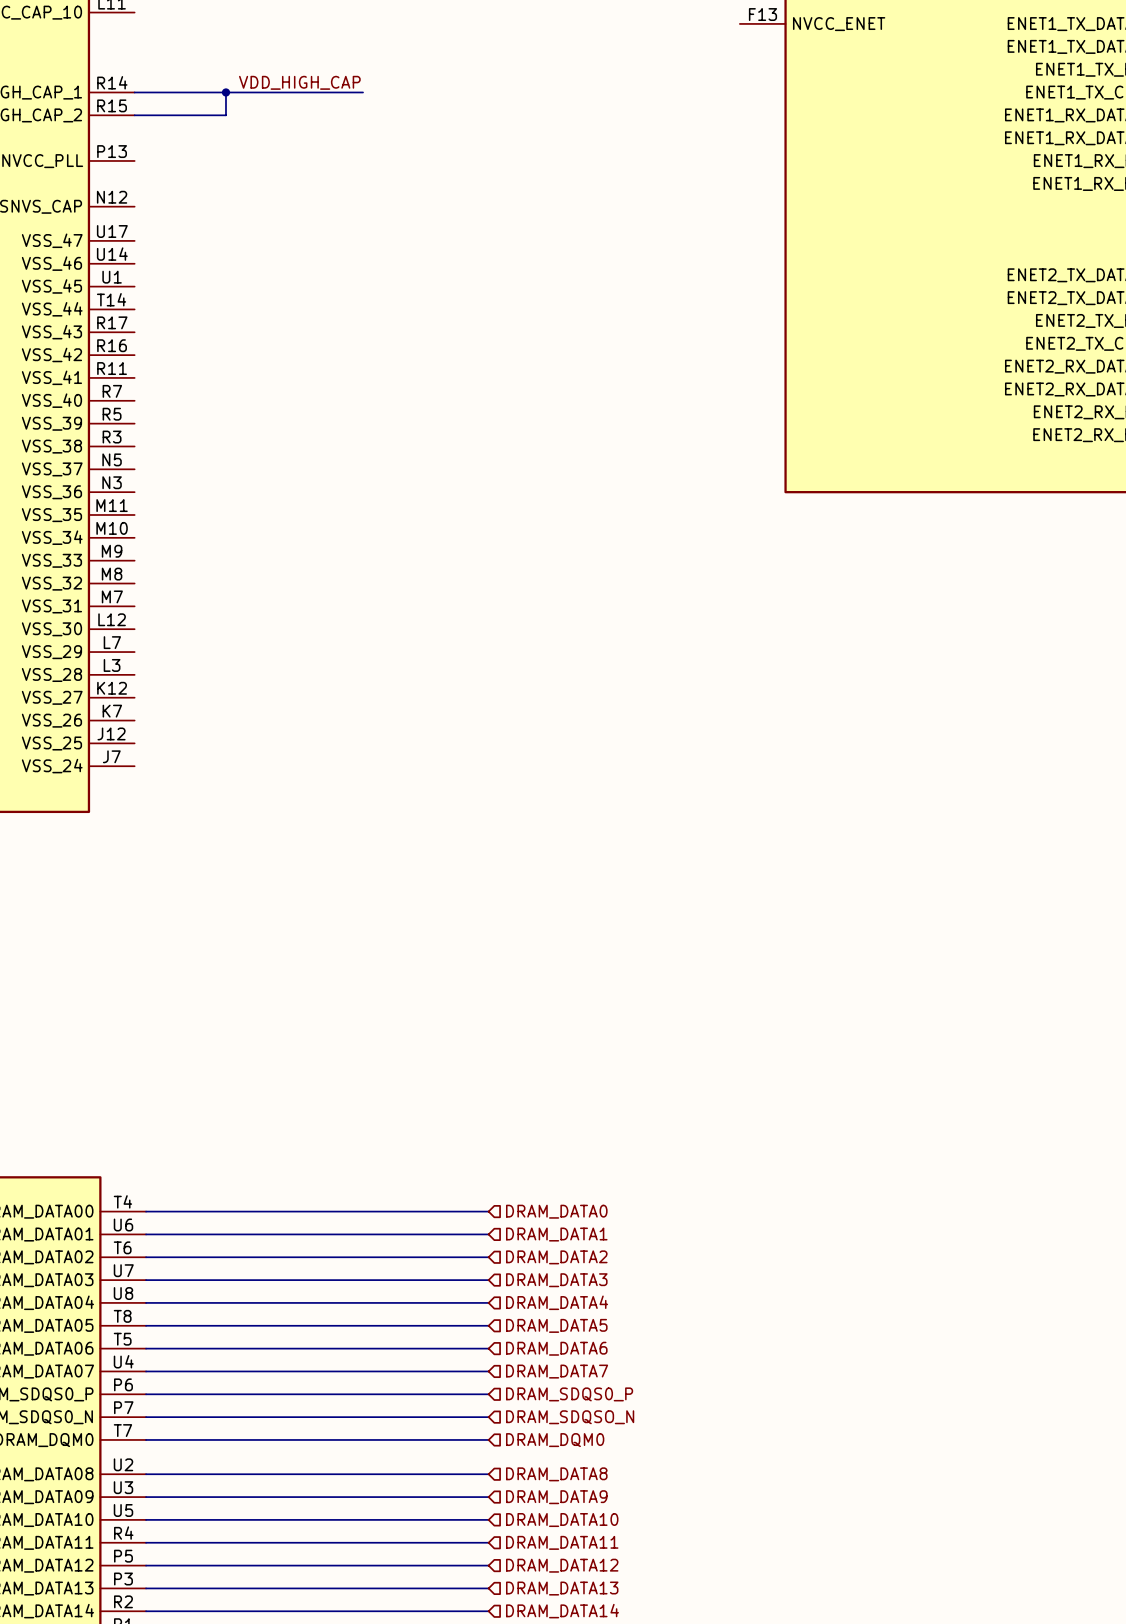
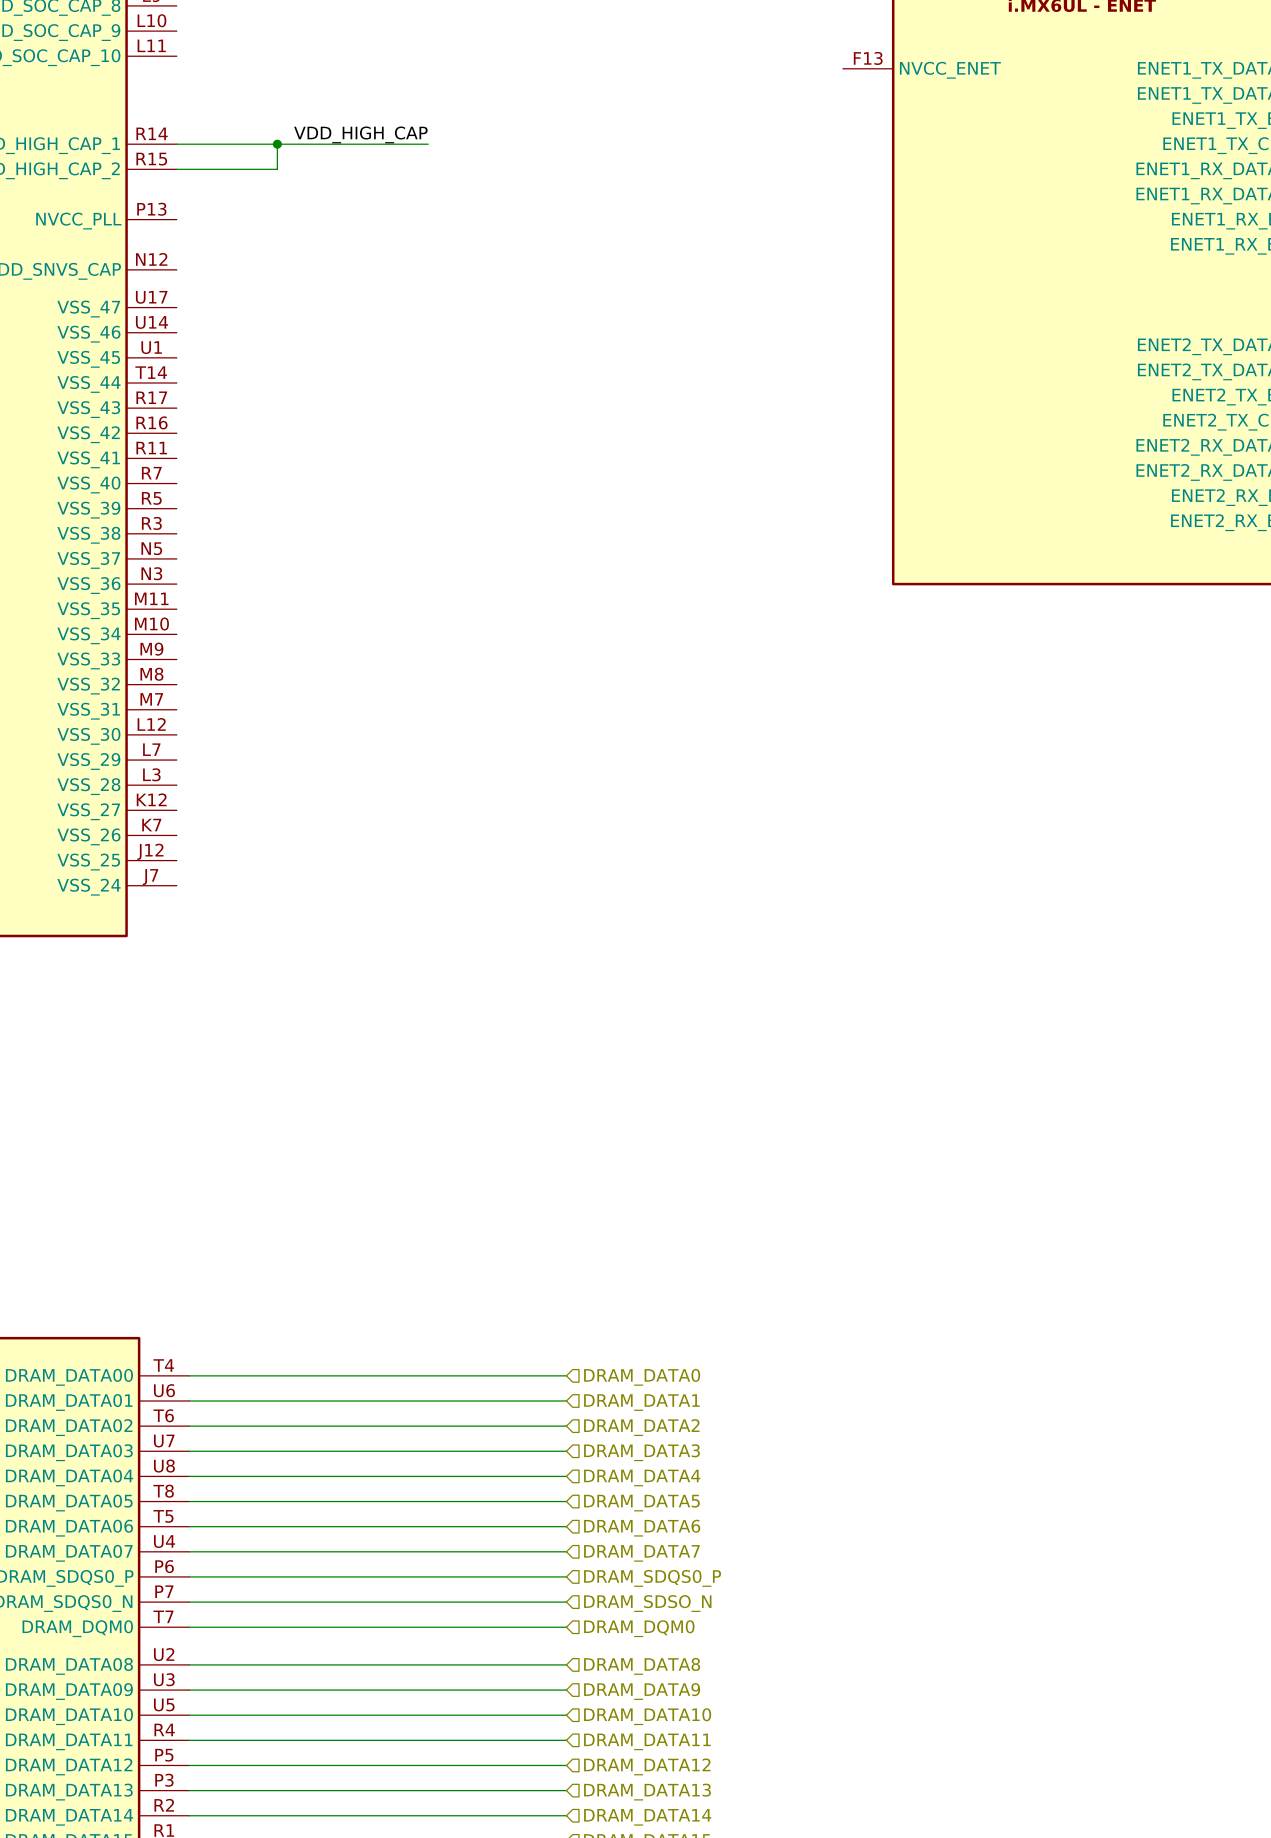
hierarchical label: DRAM_SDQSO_N (570, 1417) -> DRAM_SDSO_N (647, 1603)

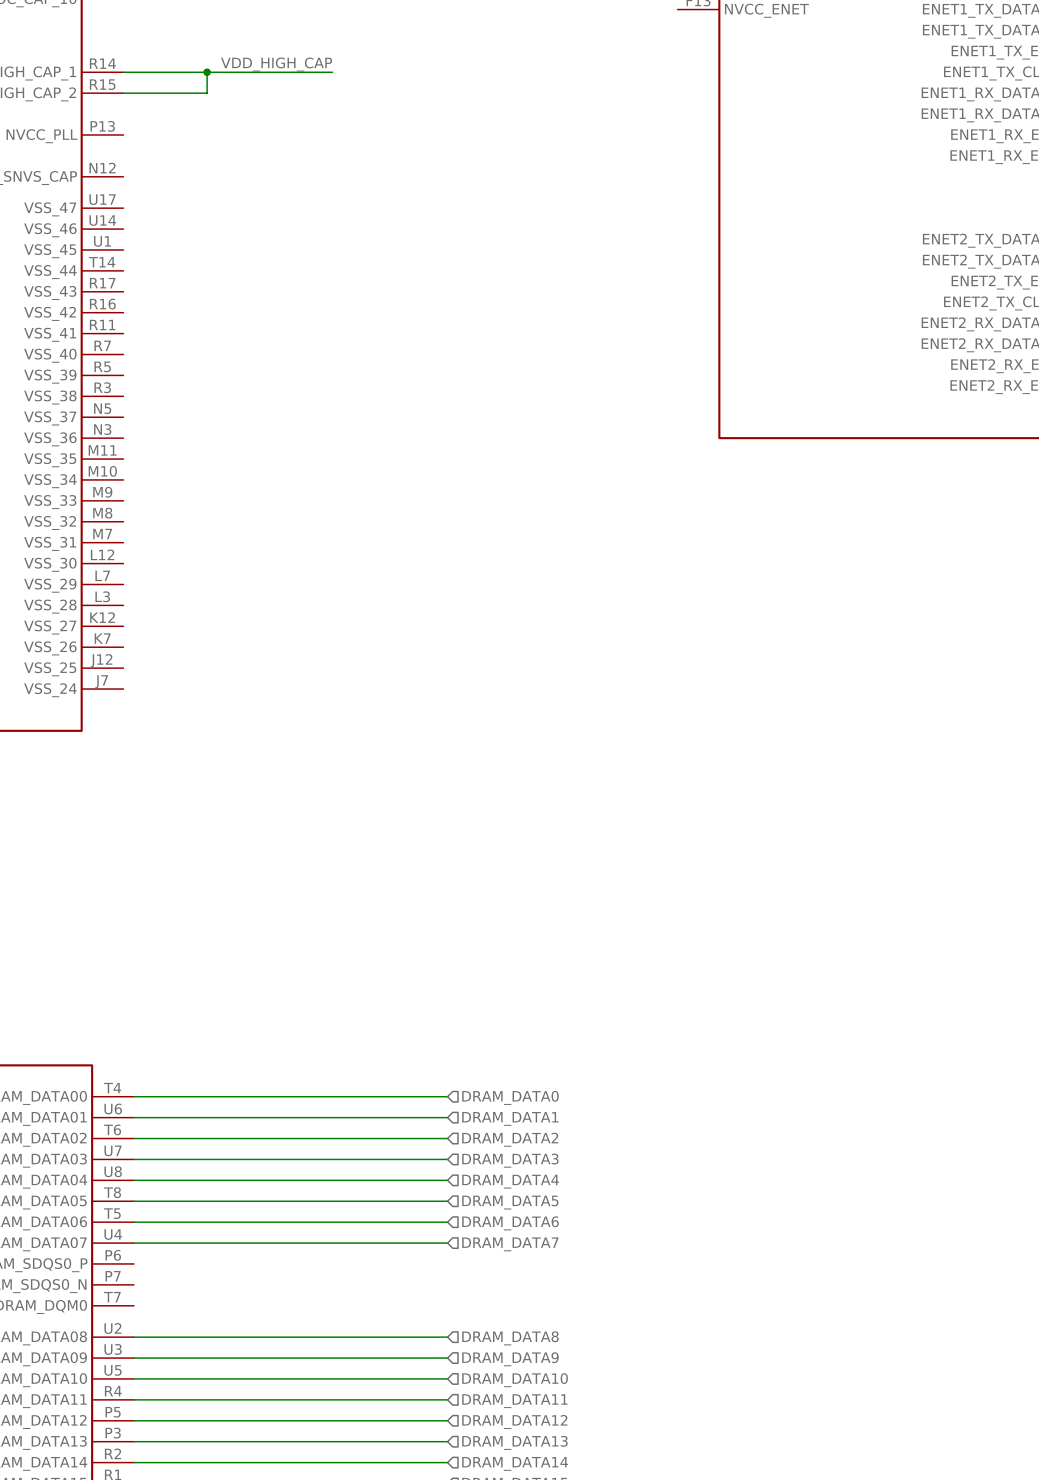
wire: (189, 1576) (566, 1576) -> none
hierarchical label: DRAM_SDQS0_P (652, 1578) -> none
wire: (189, 1602) (566, 1602) -> none
hierarchical label: DRAM_SDSO_N (647, 1603) -> none
wire: (189, 1627) (566, 1627) -> none
hierarchical label: DRAM_DQM0 (639, 1628) -> none

